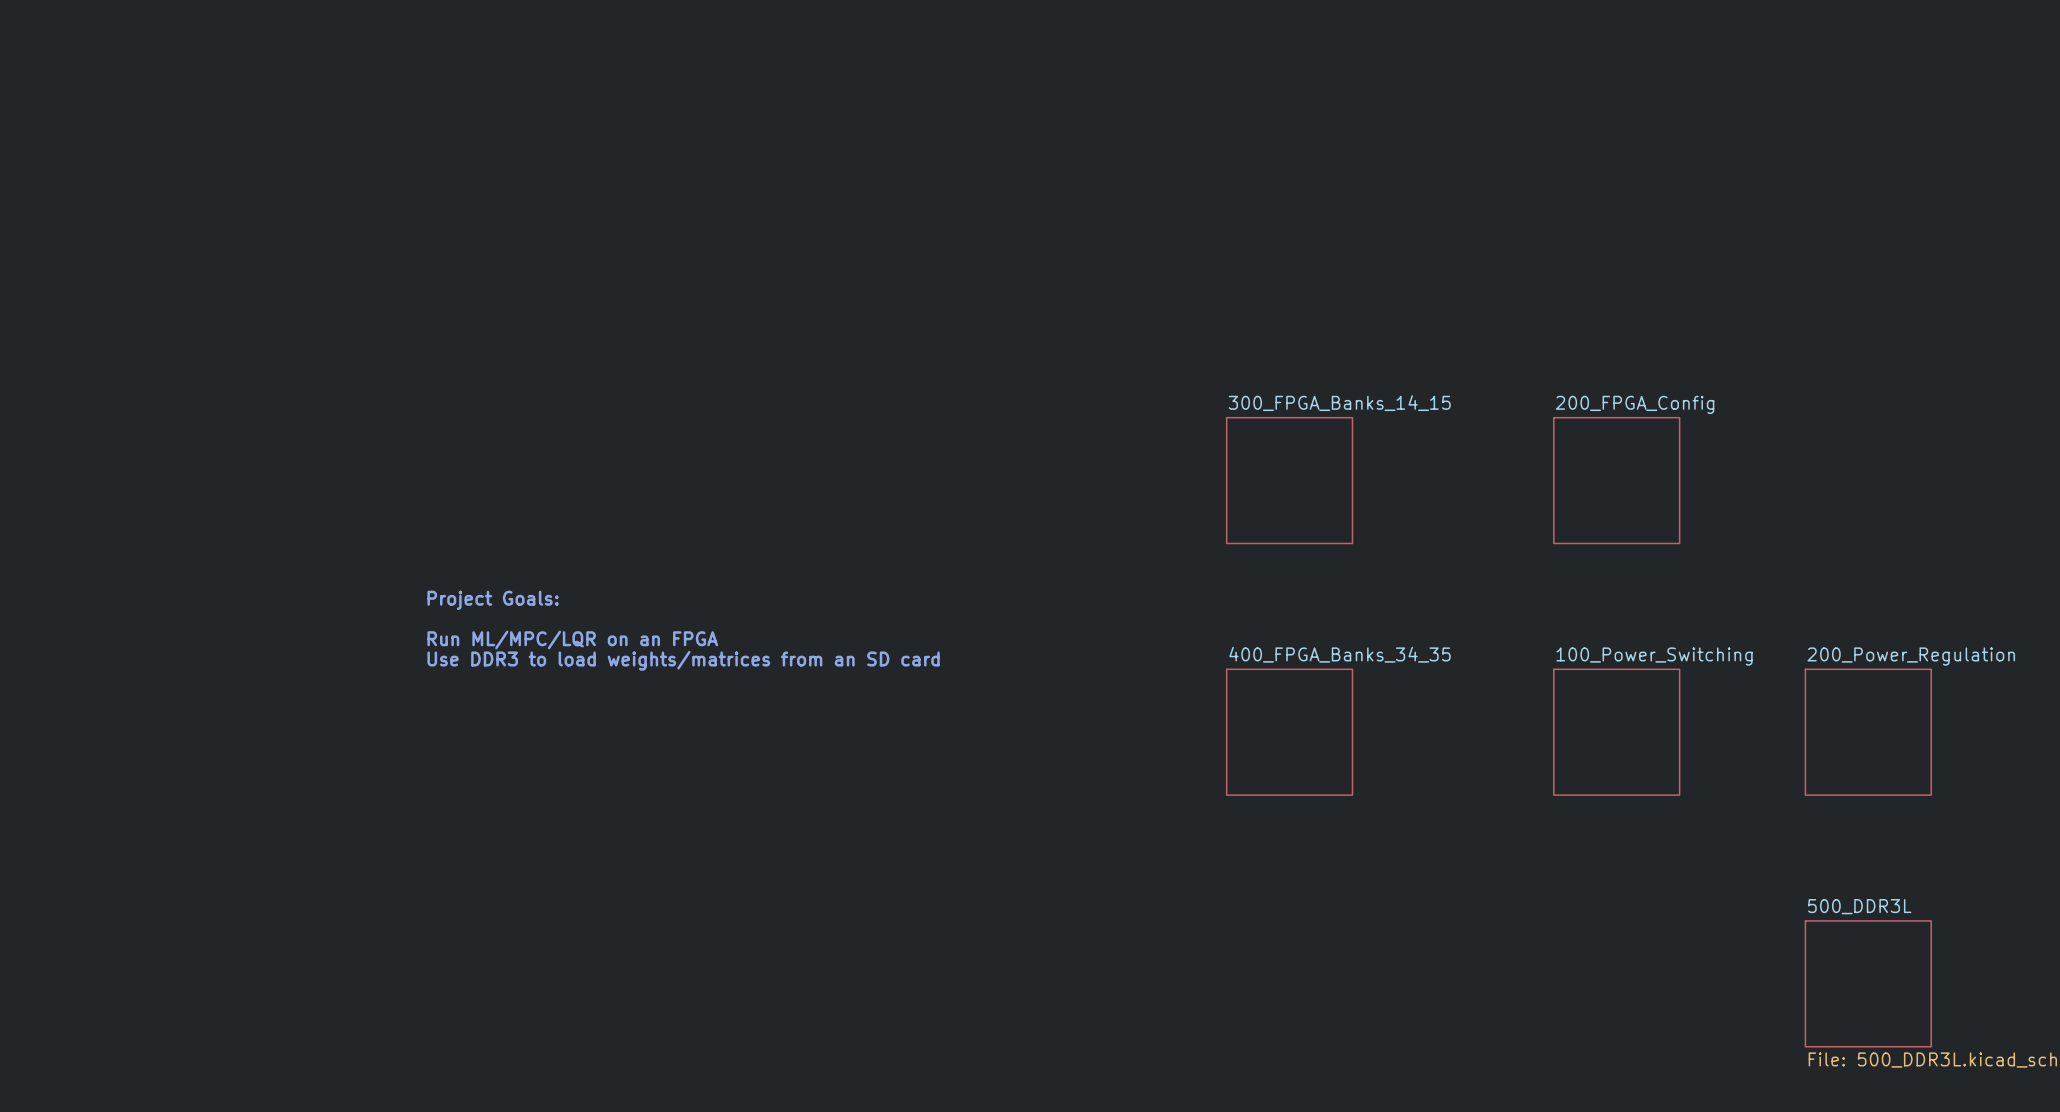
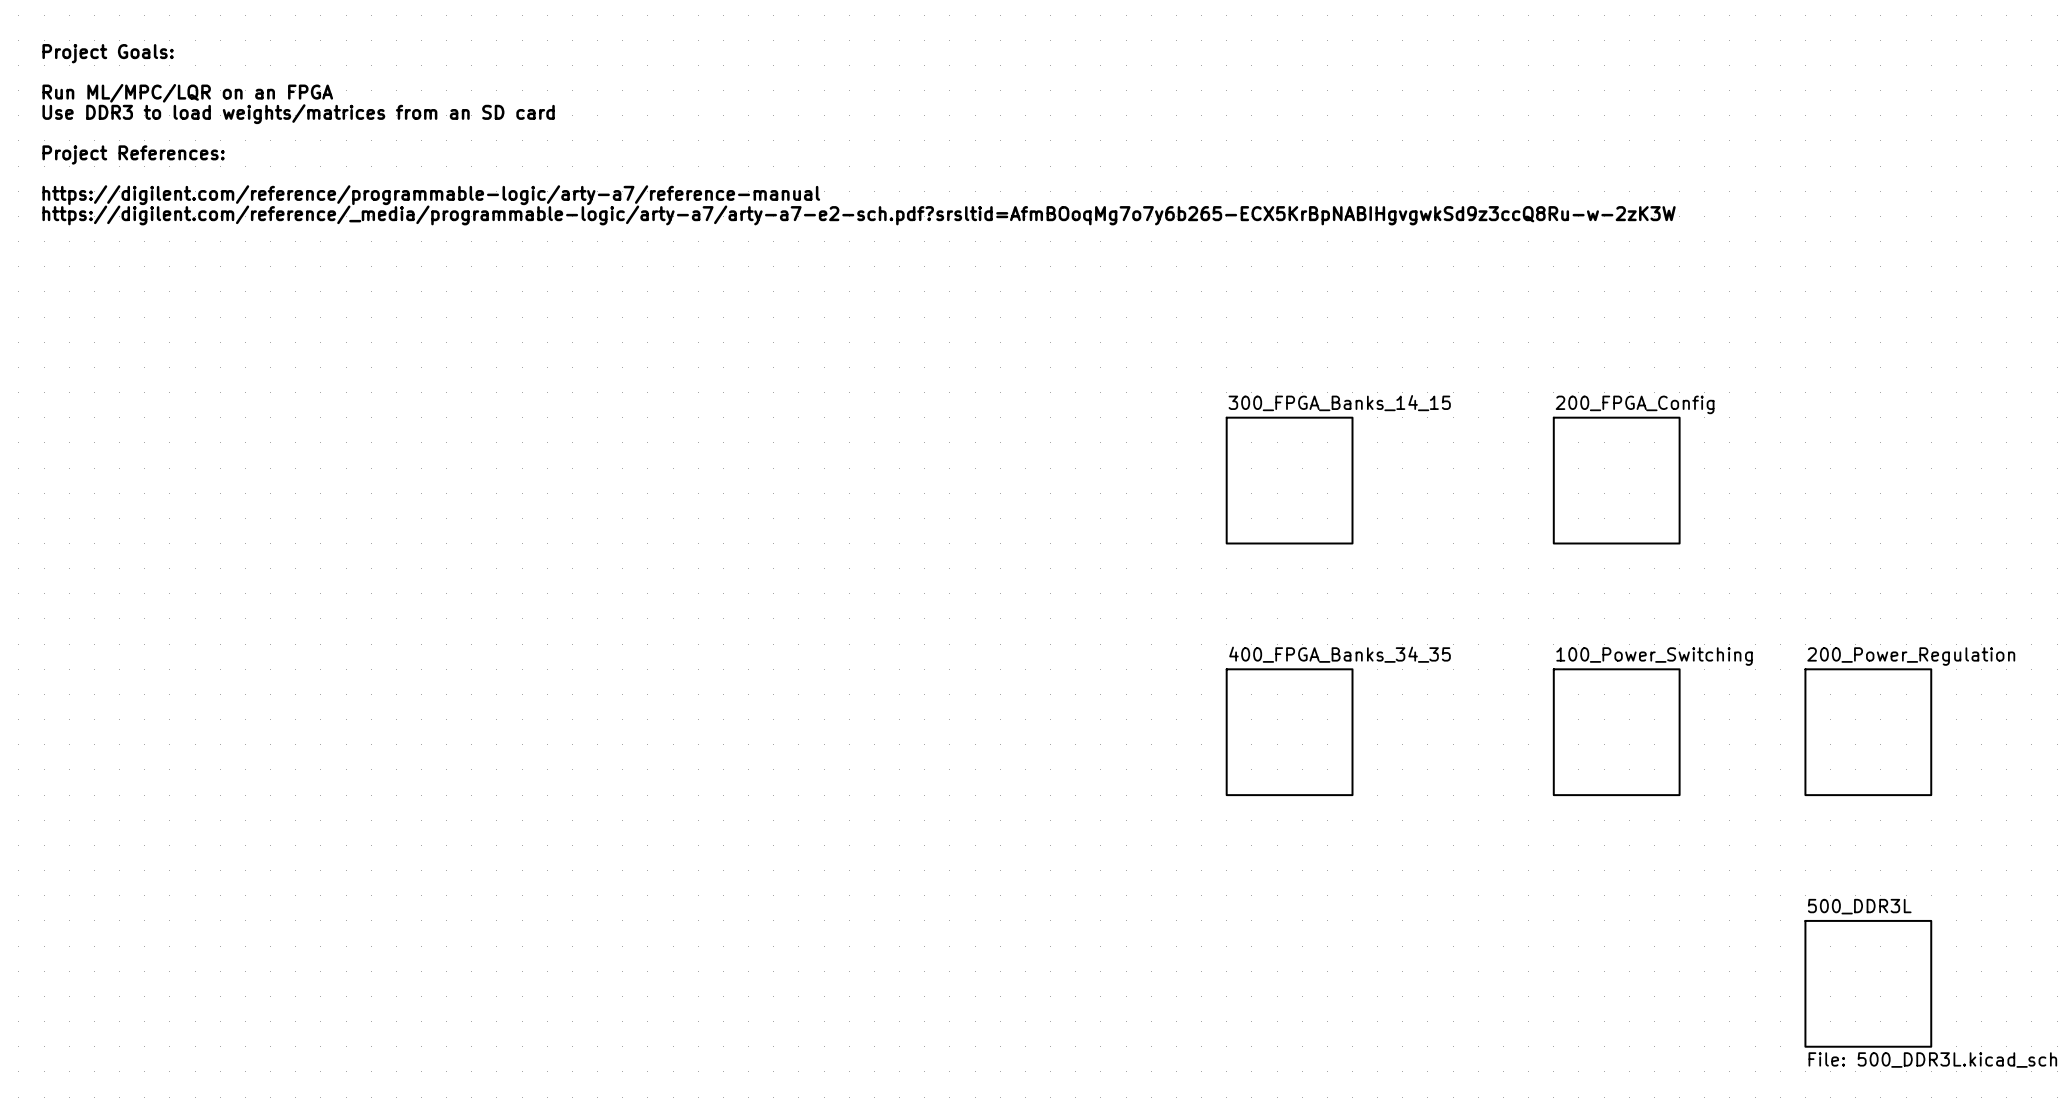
text: none -> Project Goals: (108, 53)
text: none -> Run ML/MPC/LQR on an FPGA (187, 93)
text: none -> Use DDR3 to load weights/matrices from an SD card (298, 114)
text: none -> Project References: (133, 154)
text: none -> https://digilent.com/reference/programmable-logic/arty-a7/reference-manual (431, 195)
text: none -> https://digilent.com/reference/_media/programmable-logic/arty-a7/arty-a7-e2-sch.pdf?srsltid=AfmBOoqMg7o7y6b265-ECX5KrBpNABIHgvgwkSd9z3ccQ8Ru-w-2zK3W (859, 215)
text: Project Goals: (493, 600) -> none
text: Run ML/MPC/LQR on an FPGA (572, 639) -> none
text: Use DDR3 to load weights/matrices from an SD card (683, 660) -> none

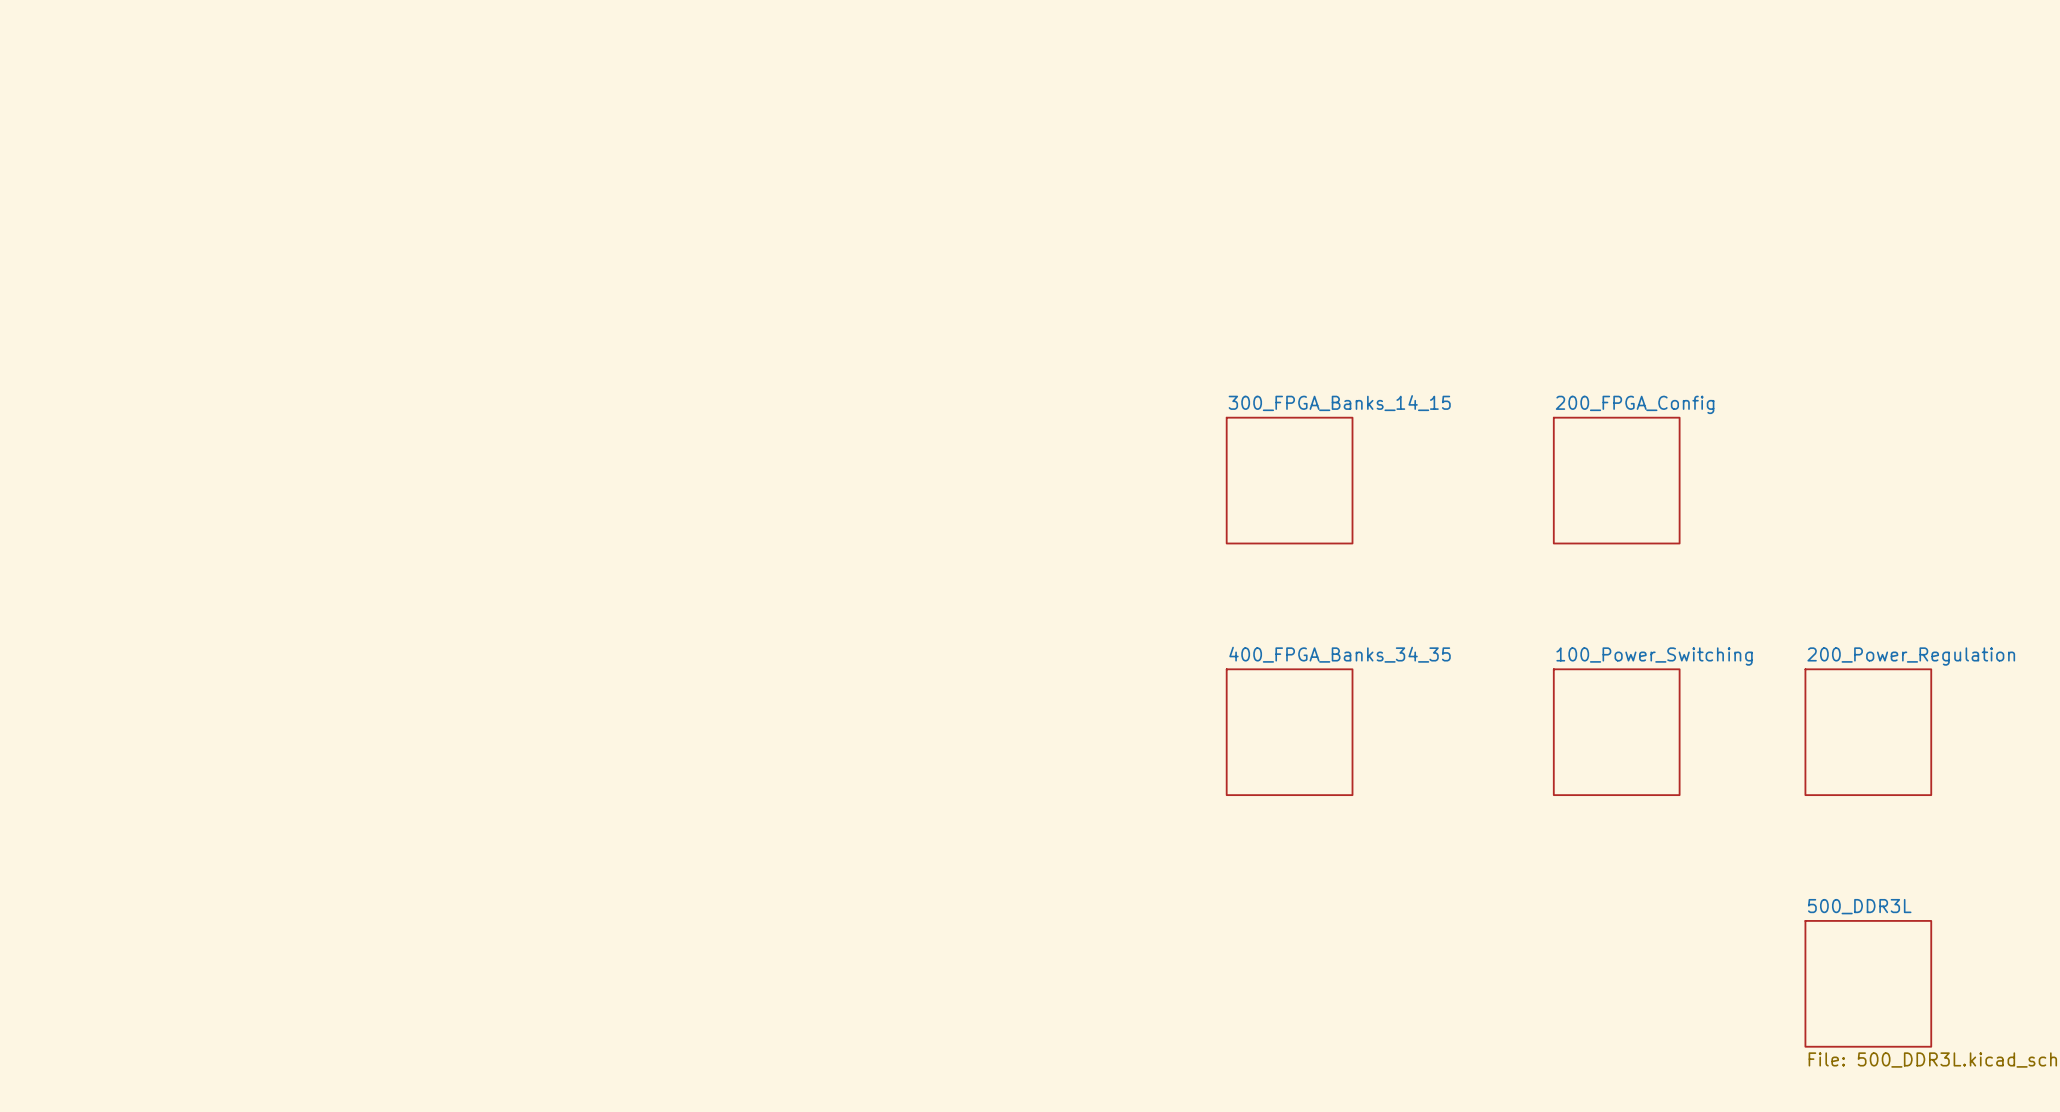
text: Project Goals: (108, 53) -> none
text: Run ML/MPC/LQR on an FPGA (187, 93) -> none
text: Use DDR3 to load weights/matrices from an SD card (298, 114) -> none
text: Project References: (133, 154) -> none
text: https://digilent.com/reference/programmable-logic/arty-a7/reference-manual (431, 195) -> none
text: https://digilent.com/reference/_media/programmable-logic/arty-a7/arty-a7-e2-sch.pdf?srsltid=AfmBOoqMg7o7y6b265-ECX5KrBpNABIHgvgwkSd9z3ccQ8Ru-w-2zK3W (859, 215) -> none

